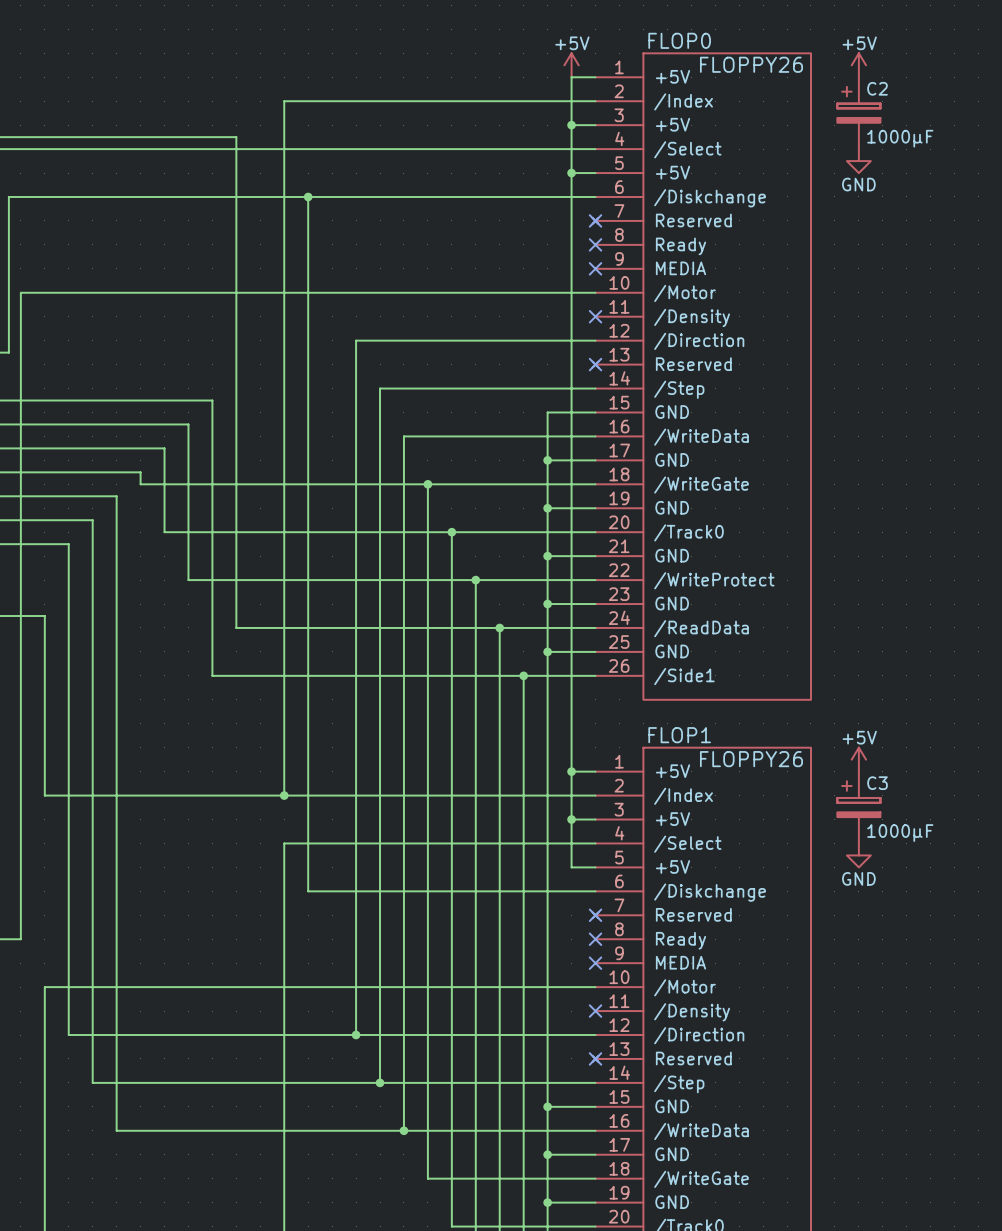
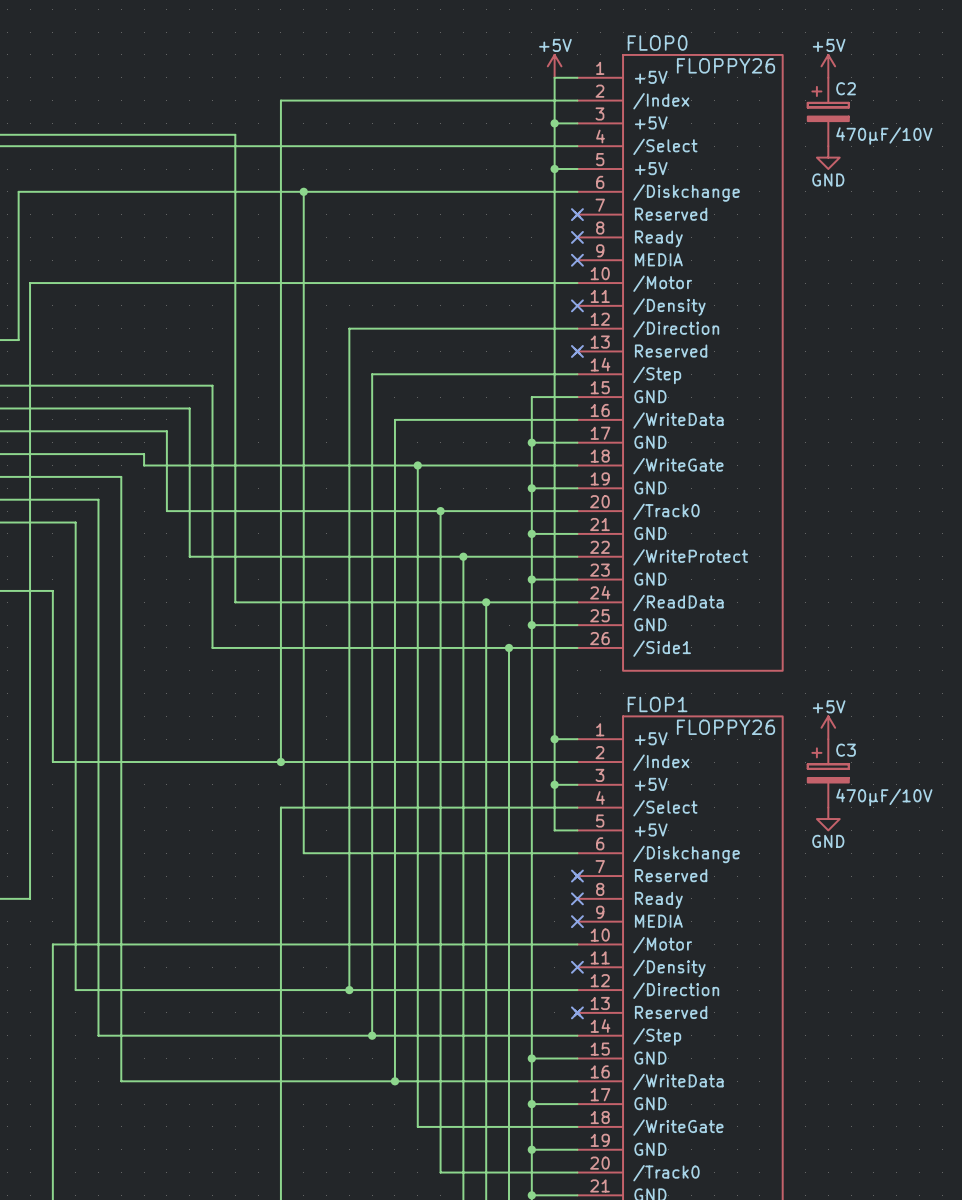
C2 value: 1000µF (900, 138) -> 470µF/10V (884, 135)
C3 value: 1000µF (900, 833) -> 470µF/10V (884, 797)

